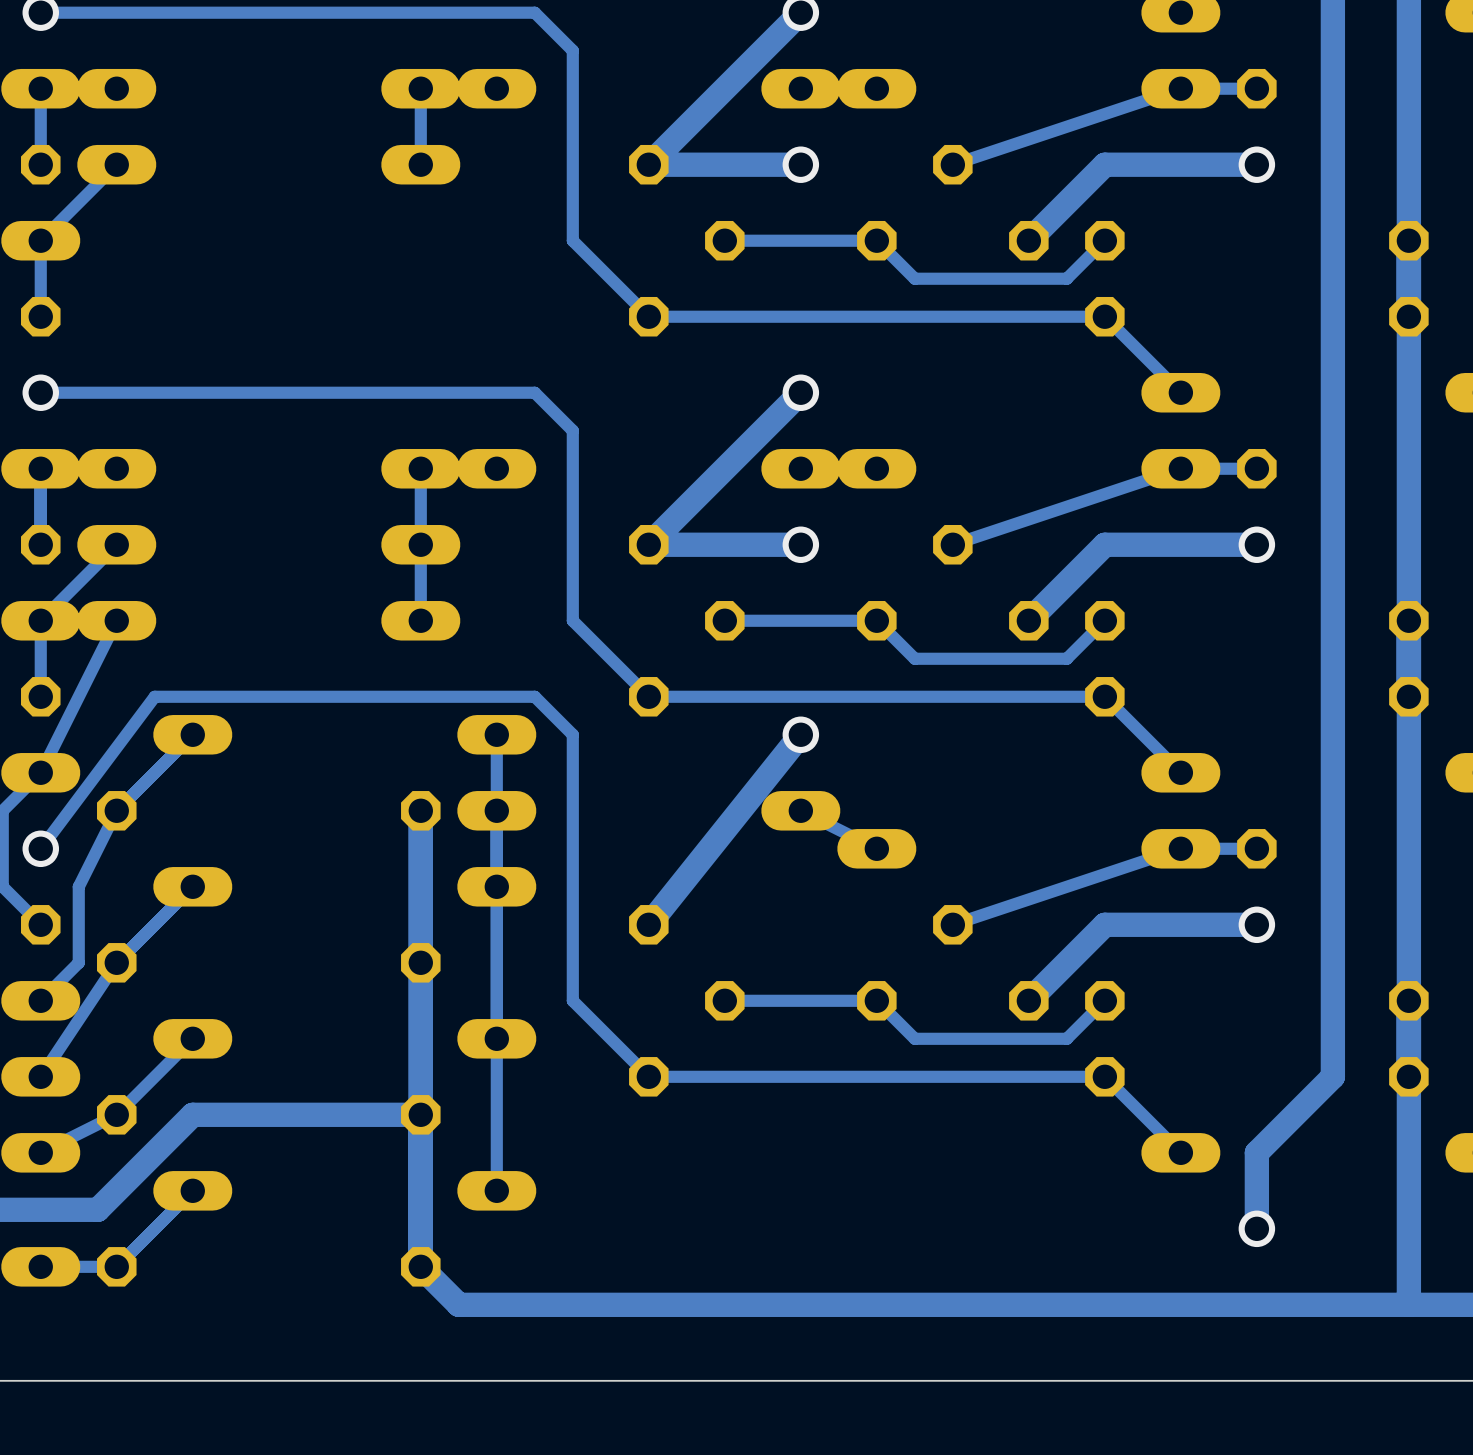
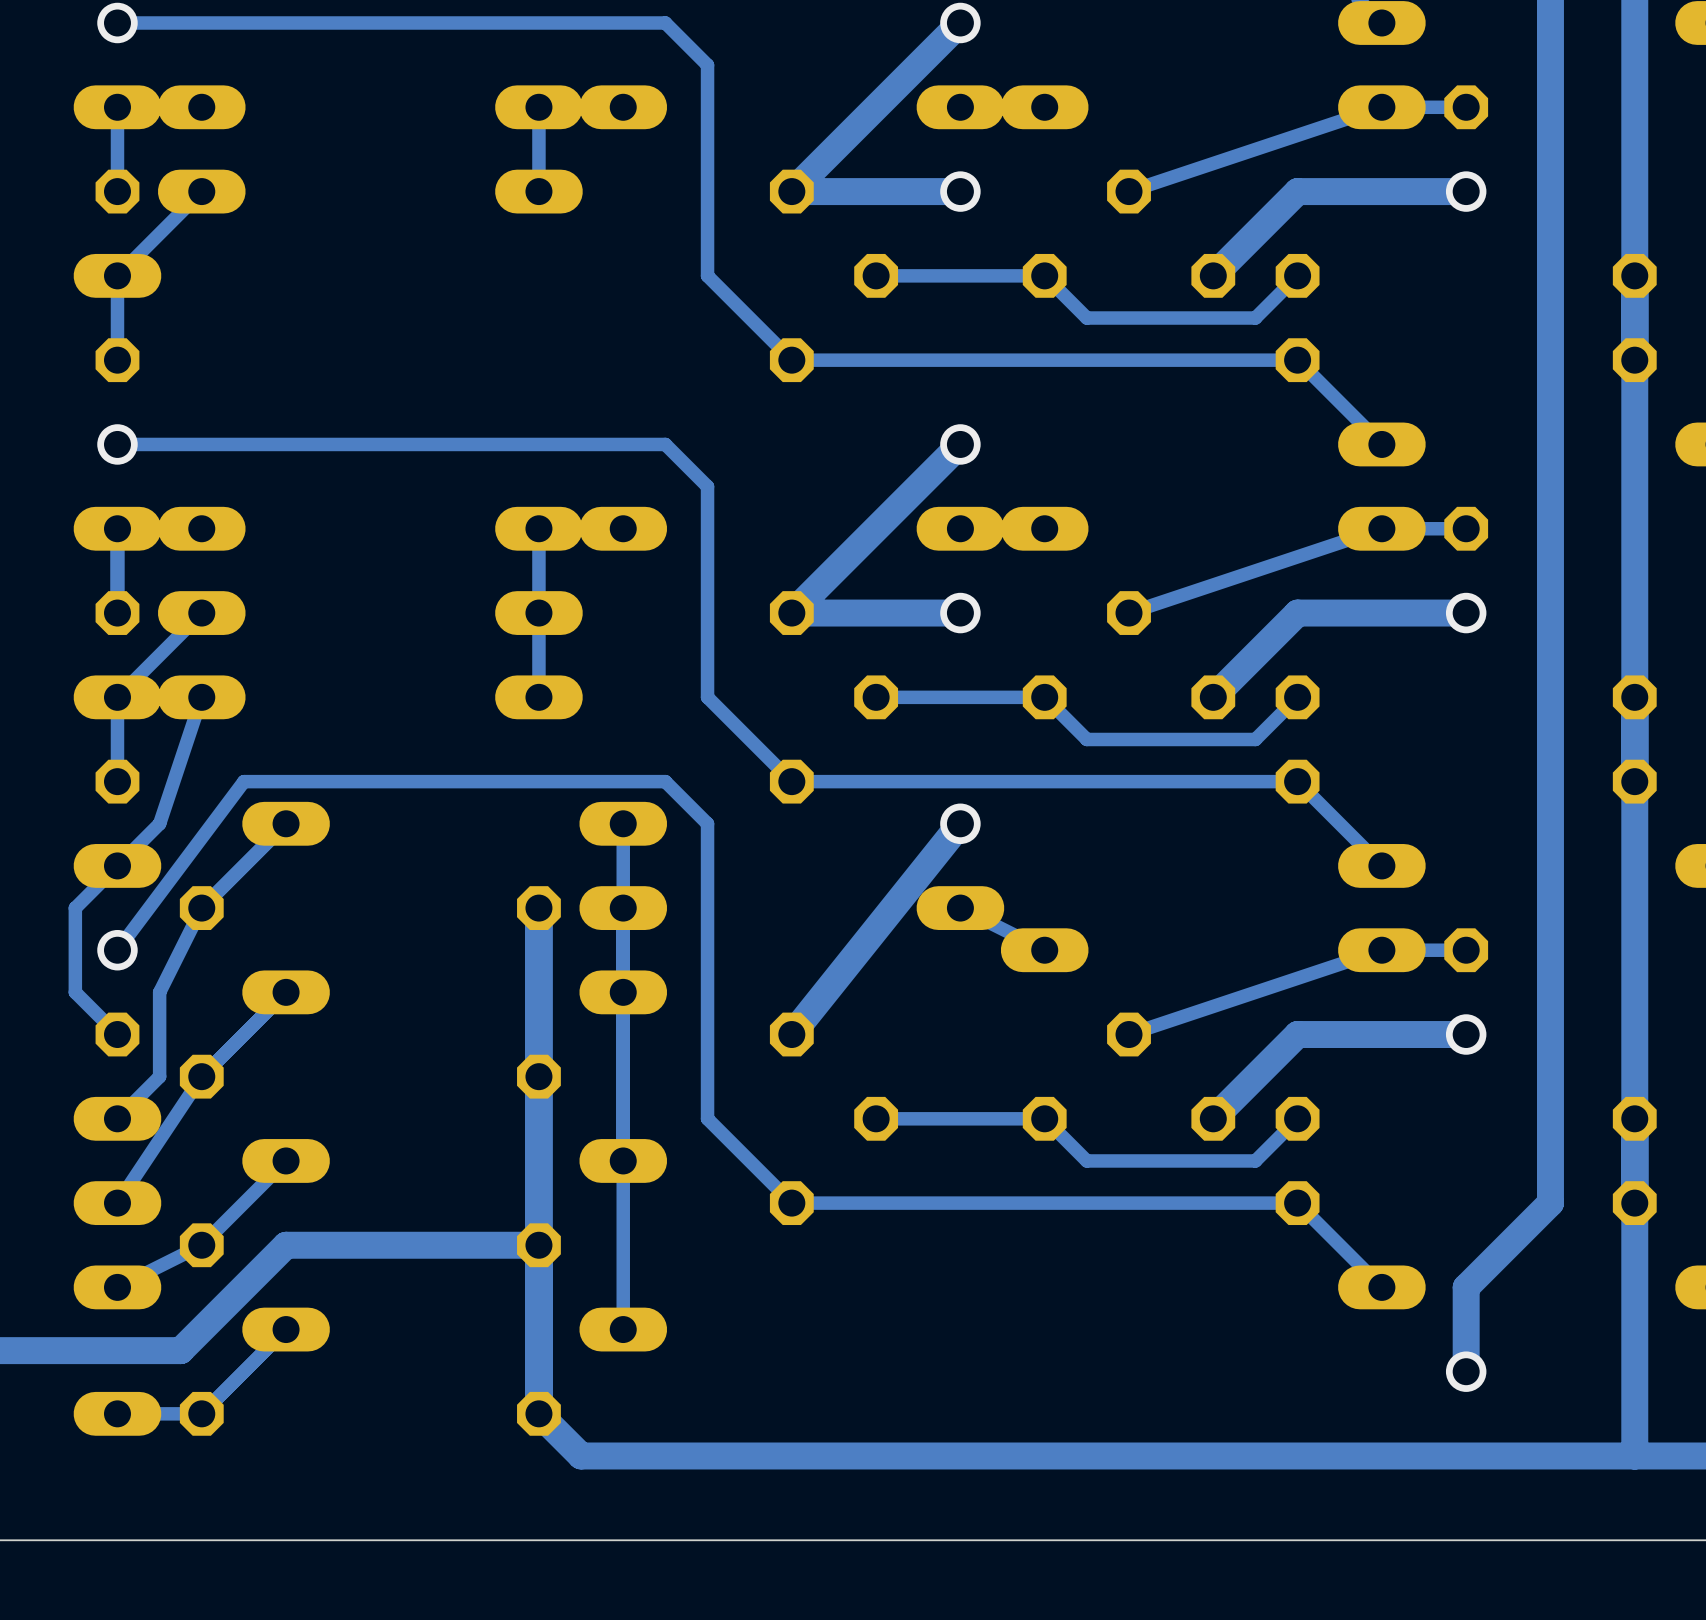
track: (116, 620) (40, 772) -> (201, 697) (159, 823) (117, 865)

